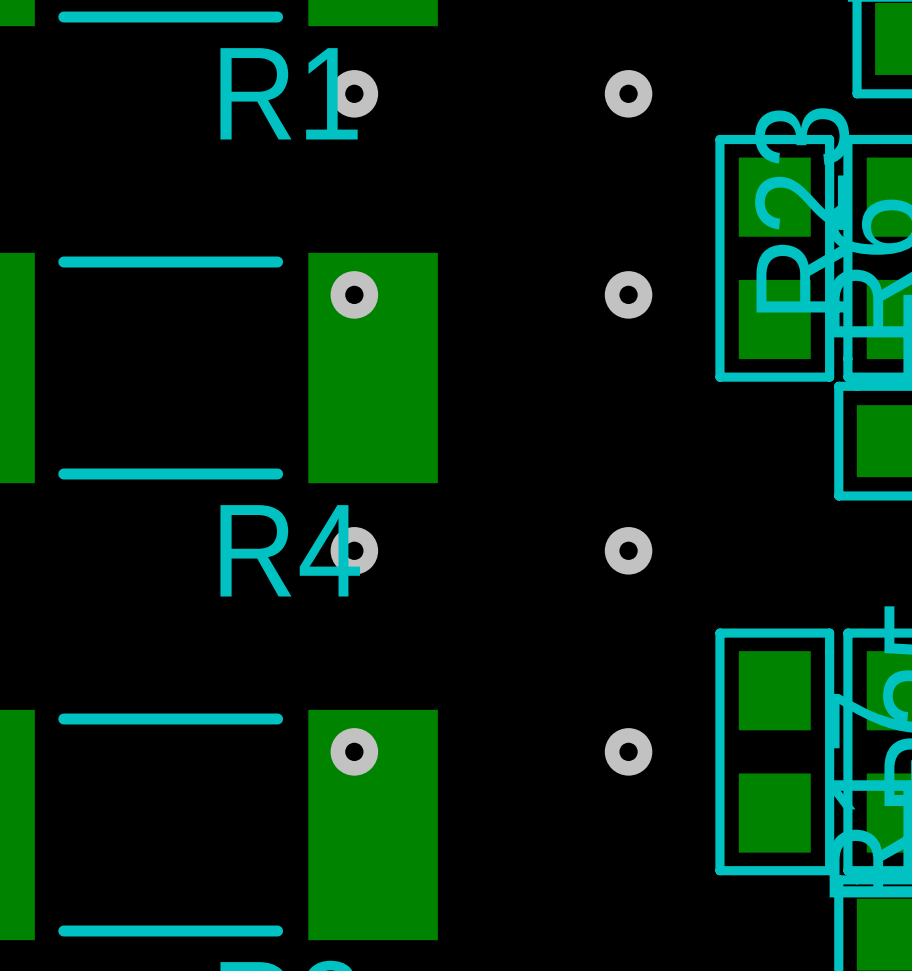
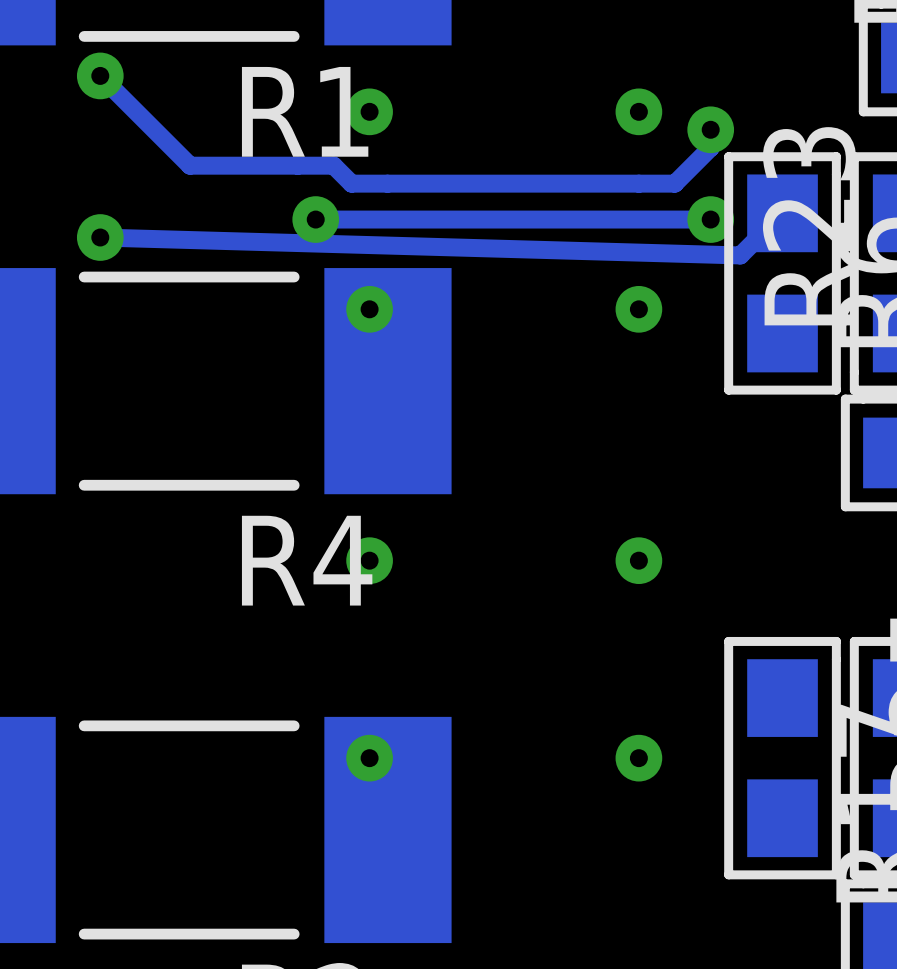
track: none -> (100, 75) (190, 165) (333, 165) (351, 183) (674, 183) (710, 147) (710, 129)
via: none -> (100, 75)
via: none -> (710, 129)
track: none -> (782, 213) (740, 255) (100, 237)
via: none -> (315, 219)
track: none -> (710, 219) (315, 219)
via: none -> (710, 219)
via: none -> (100, 237)

